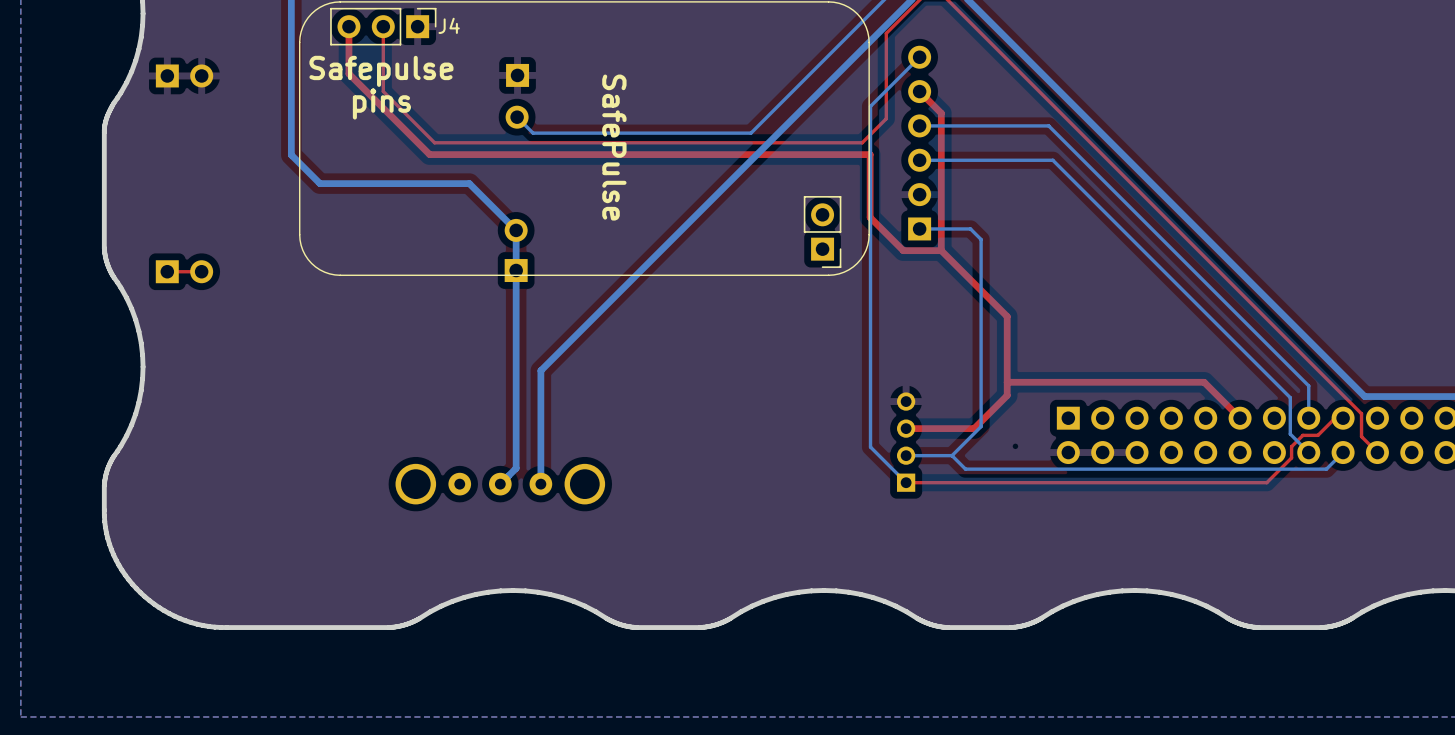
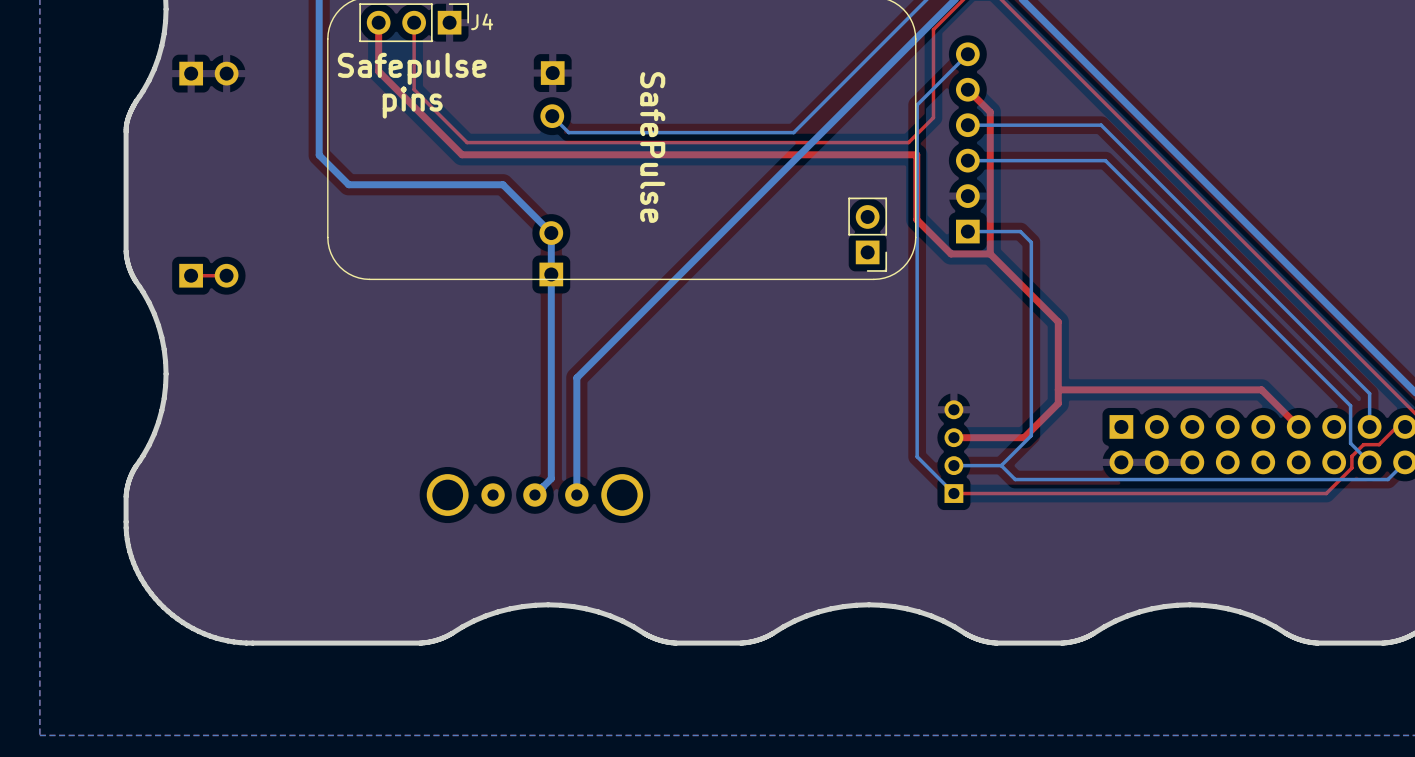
via: (1015, 446) -> none

